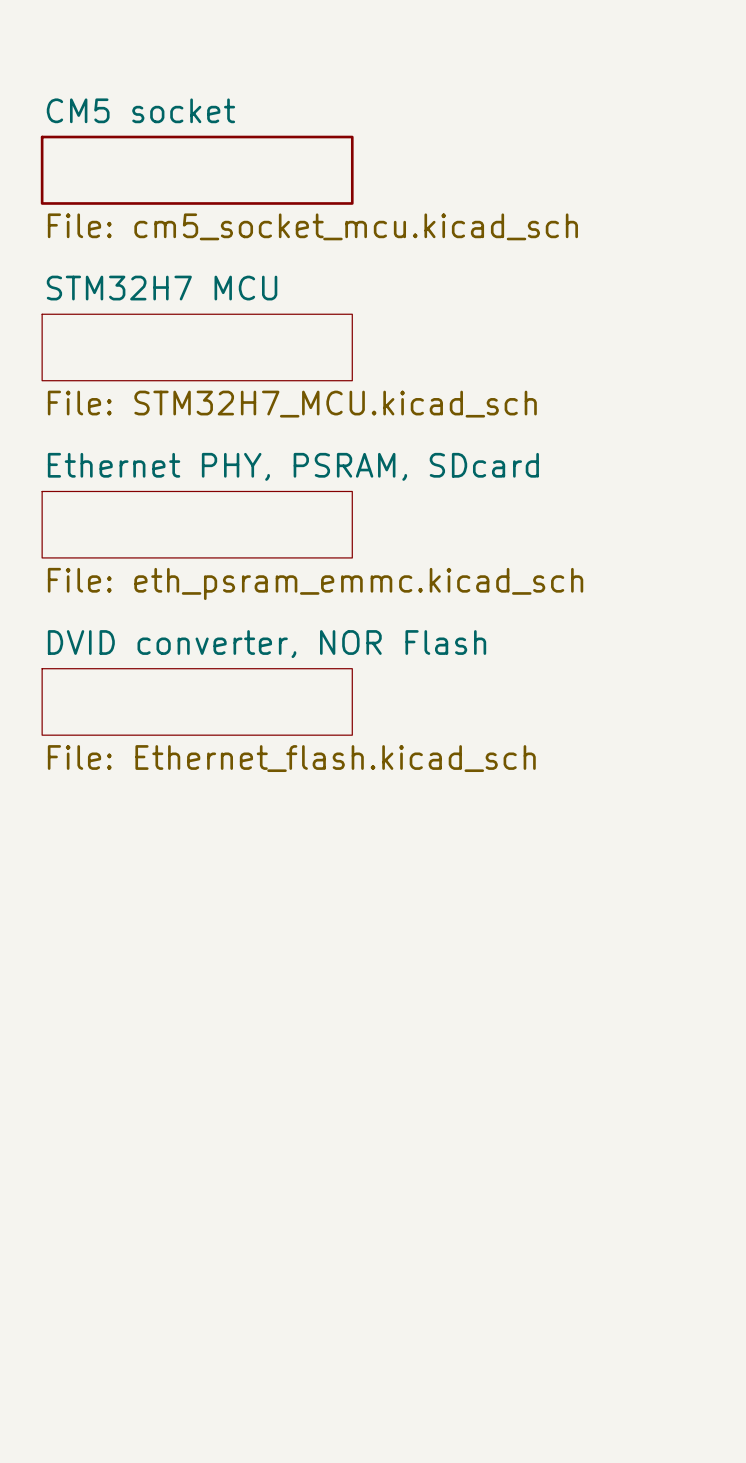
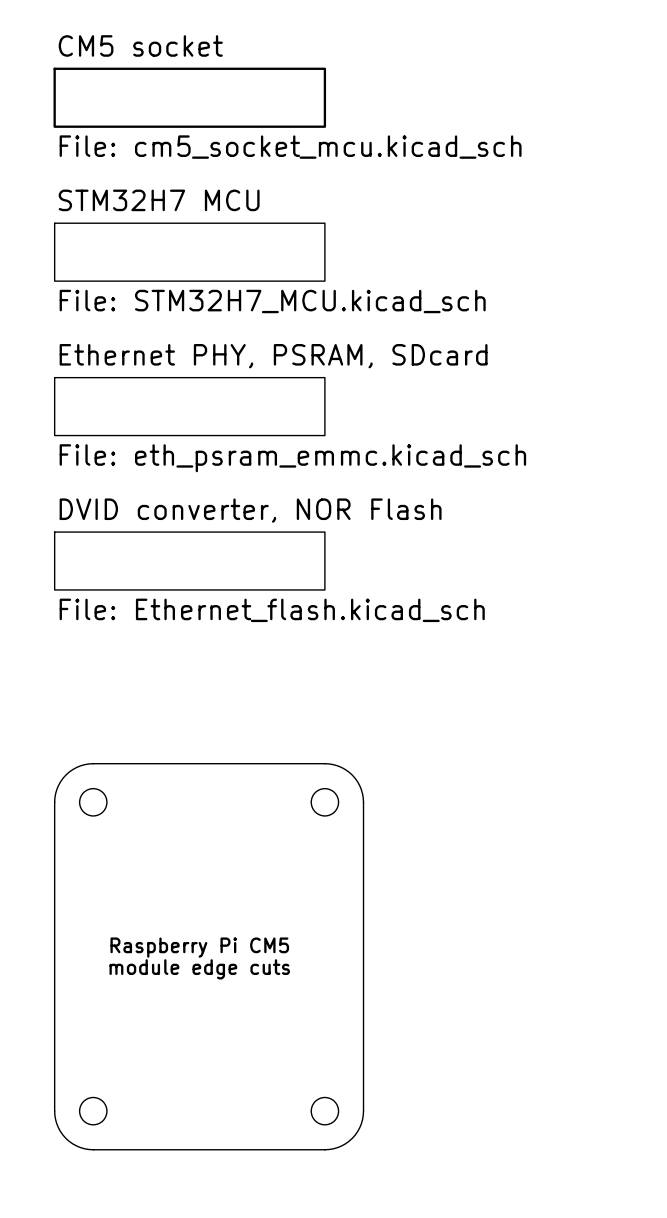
part: none -> (209, 956)

